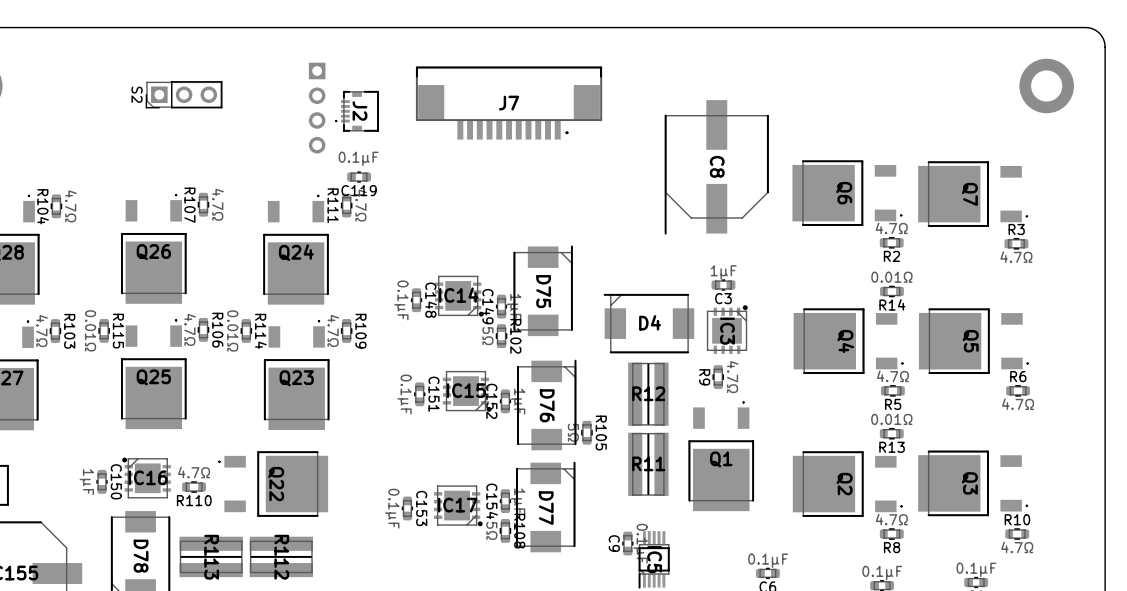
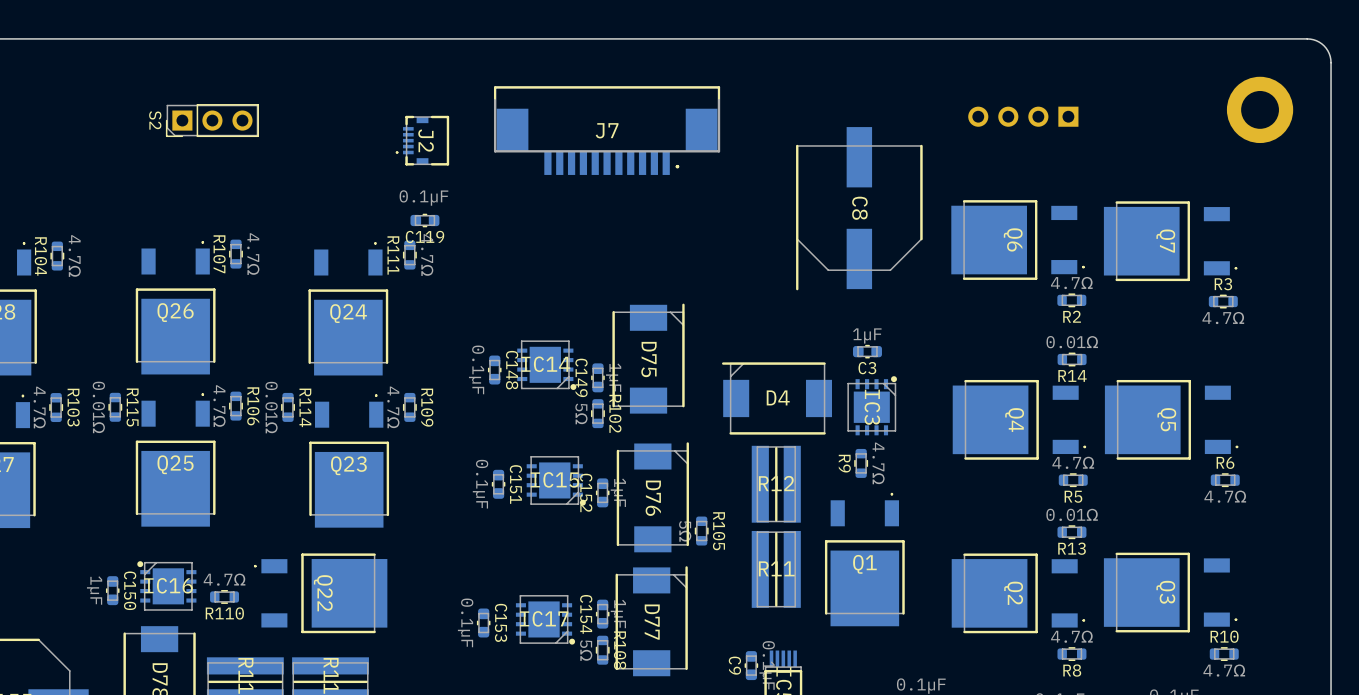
part: none -> (1023, 116)
part: (317, 108) -> none

